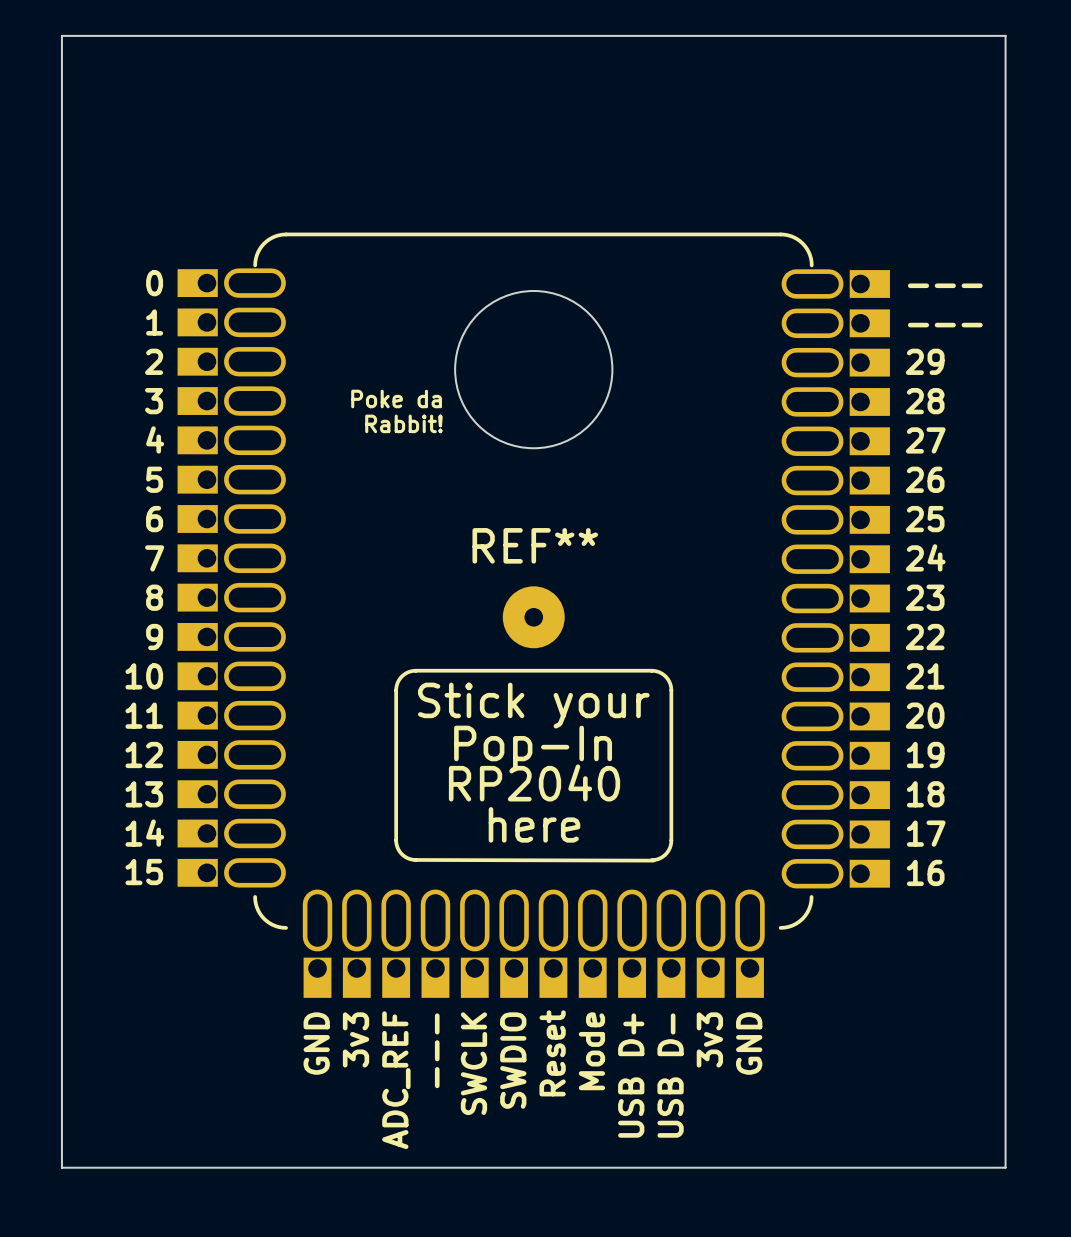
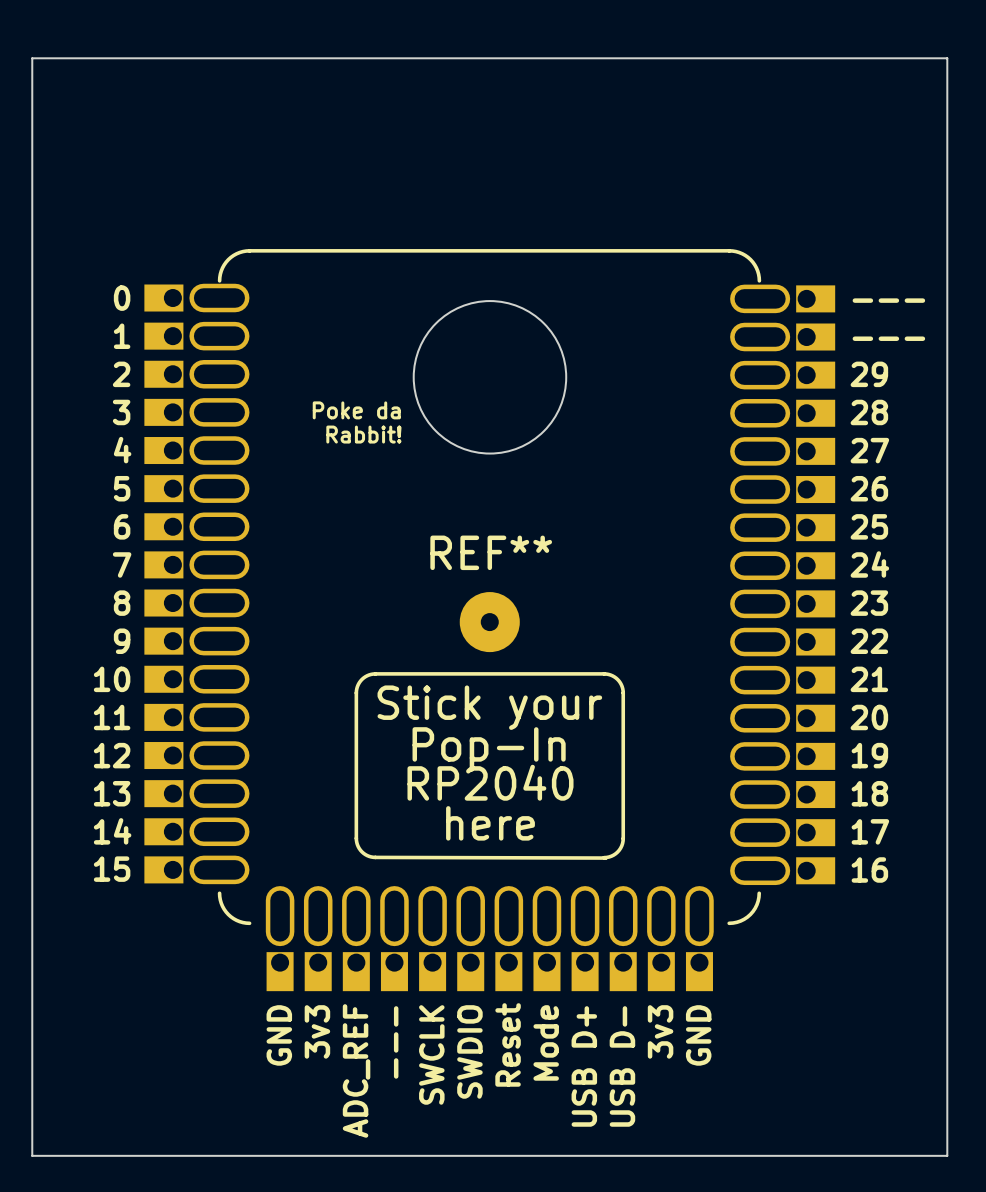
REF** footprint: [177, 232, 890, 998] -> [144, 249, 836, 992]
round board edge: none -> [412, 300, 567, 455]

